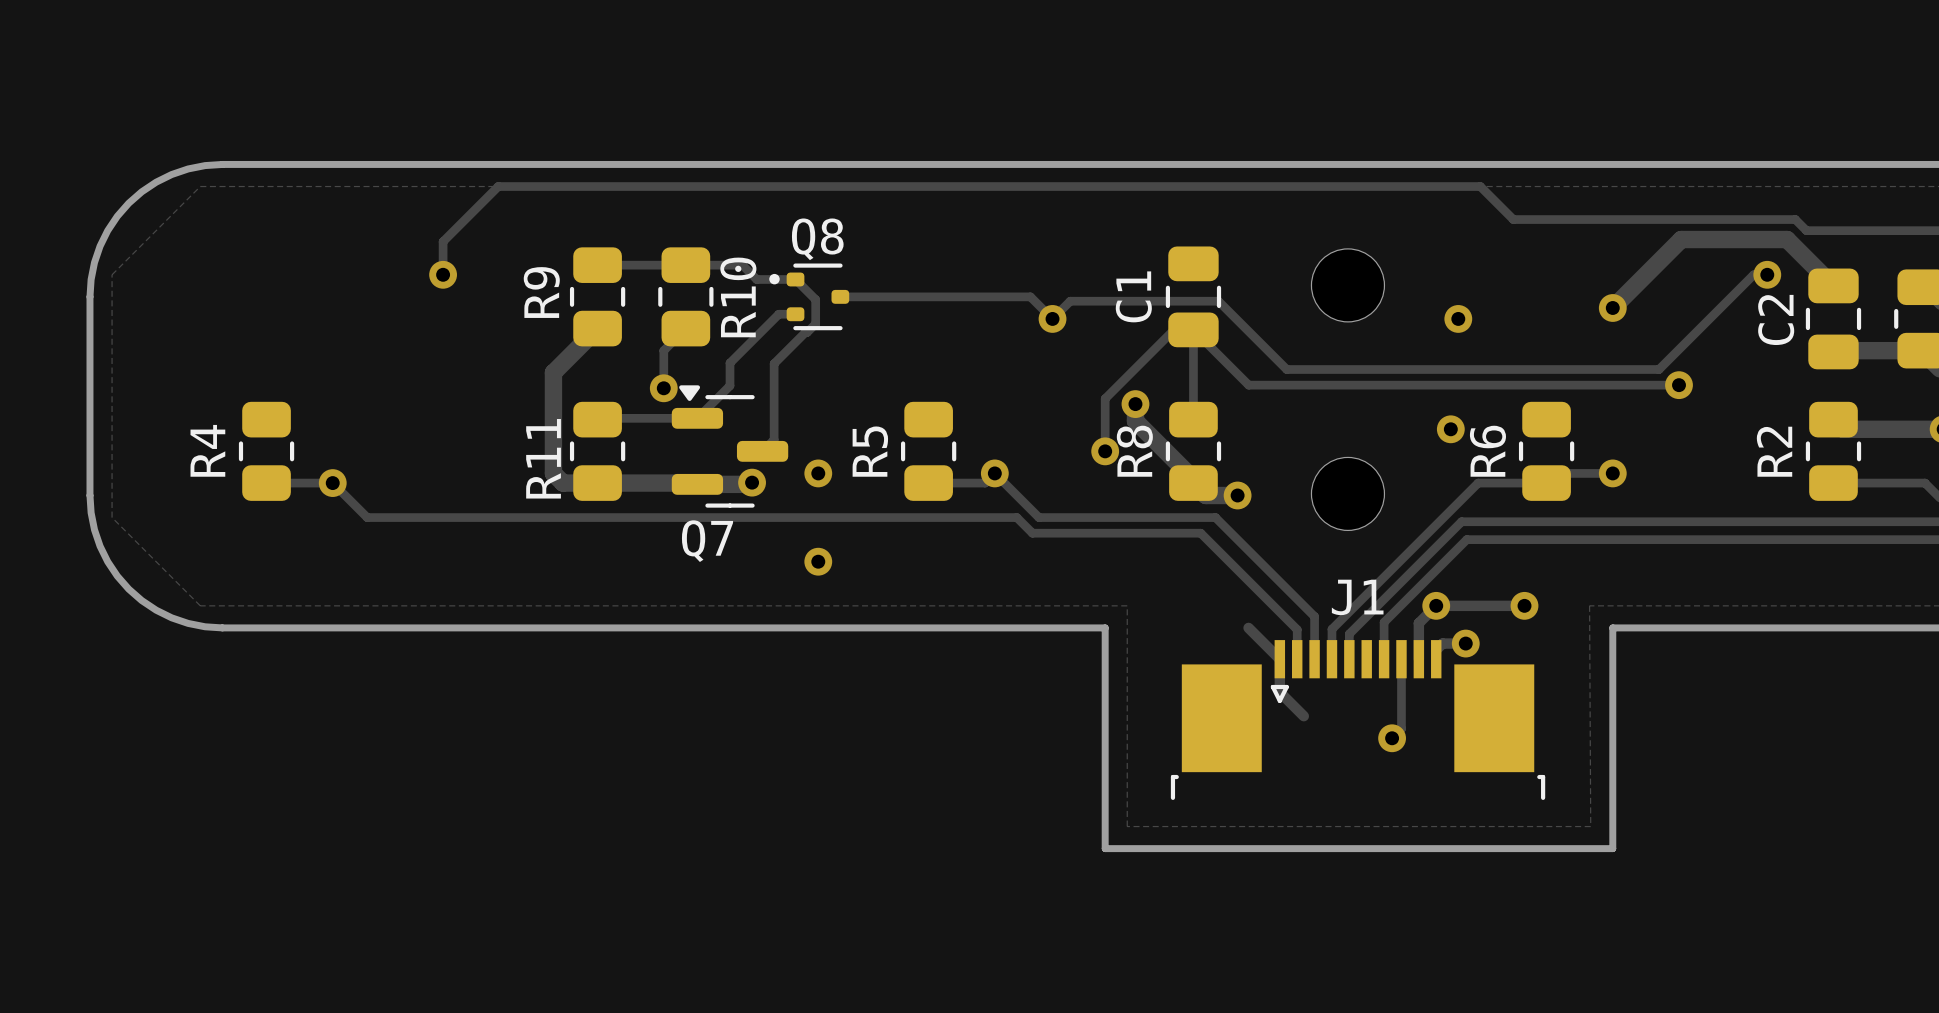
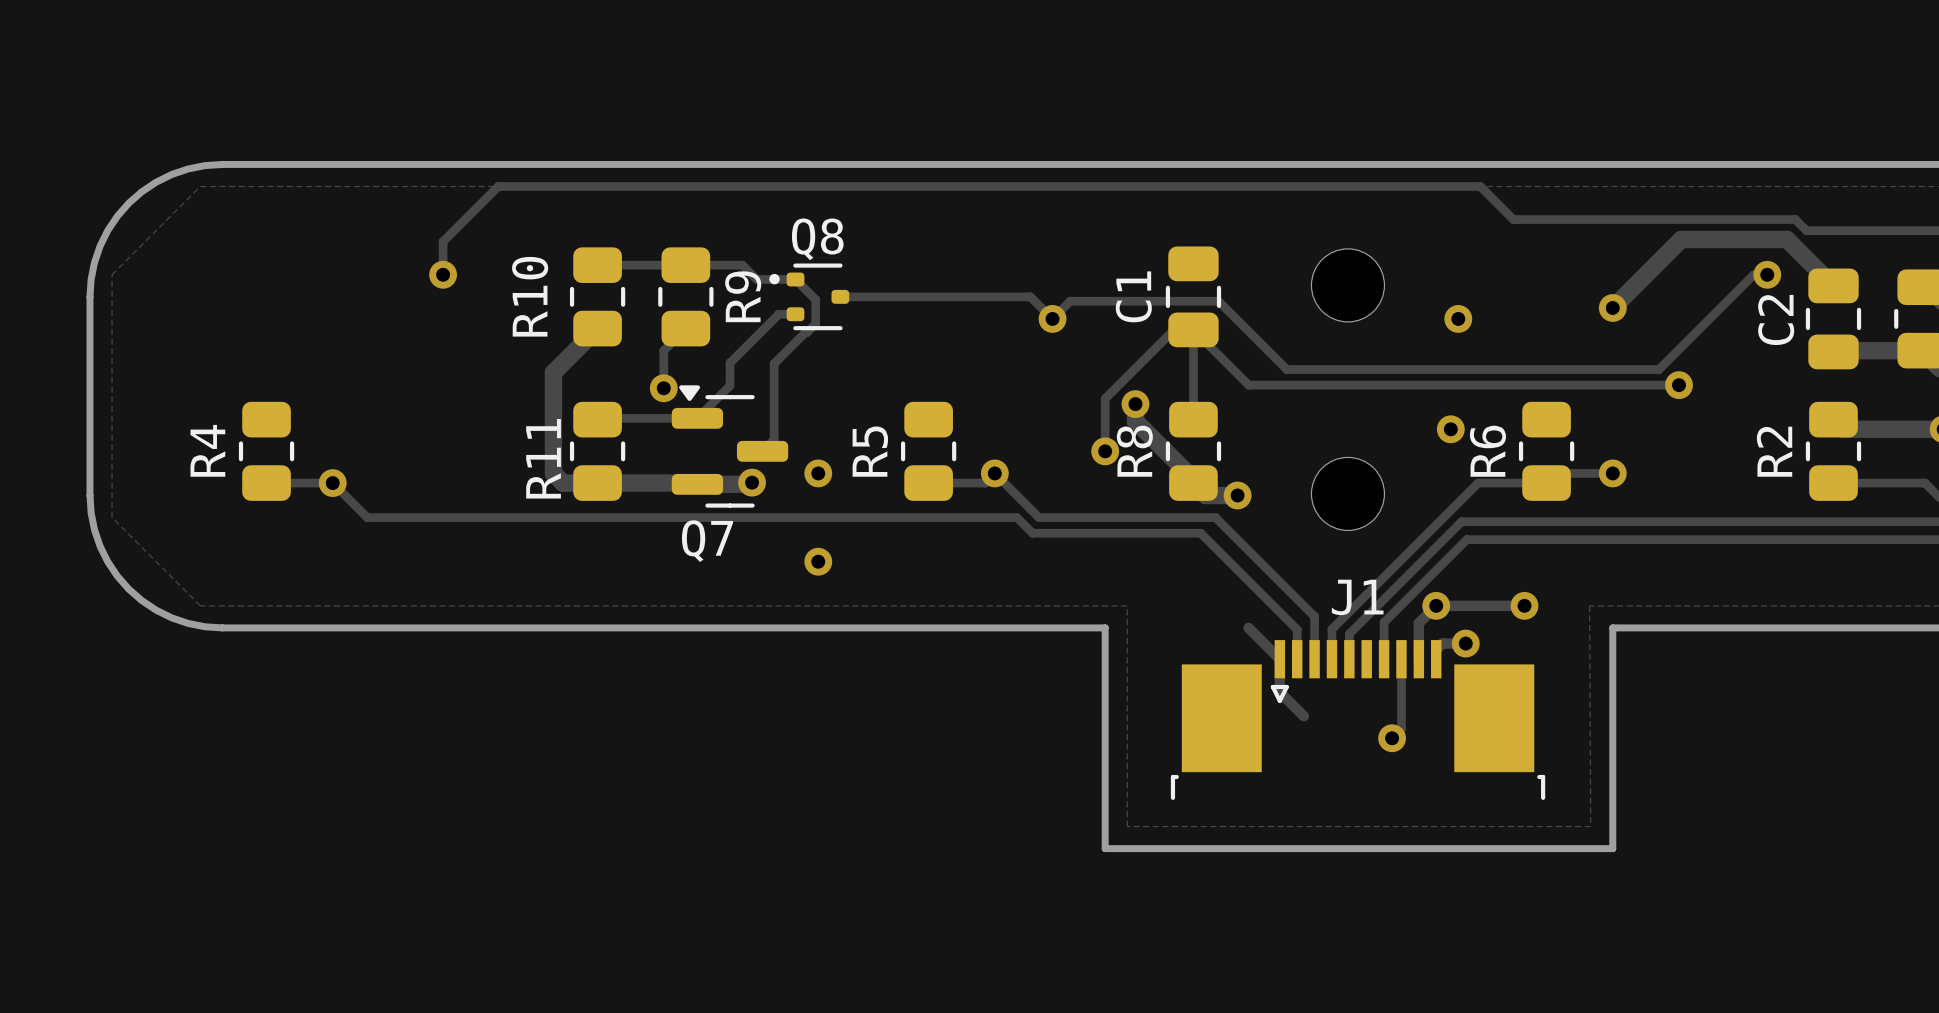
R9 name position: R9 (541, 292) -> R9 (743, 296)
R10 name position: R10 (738, 297) -> R10 (530, 296)

